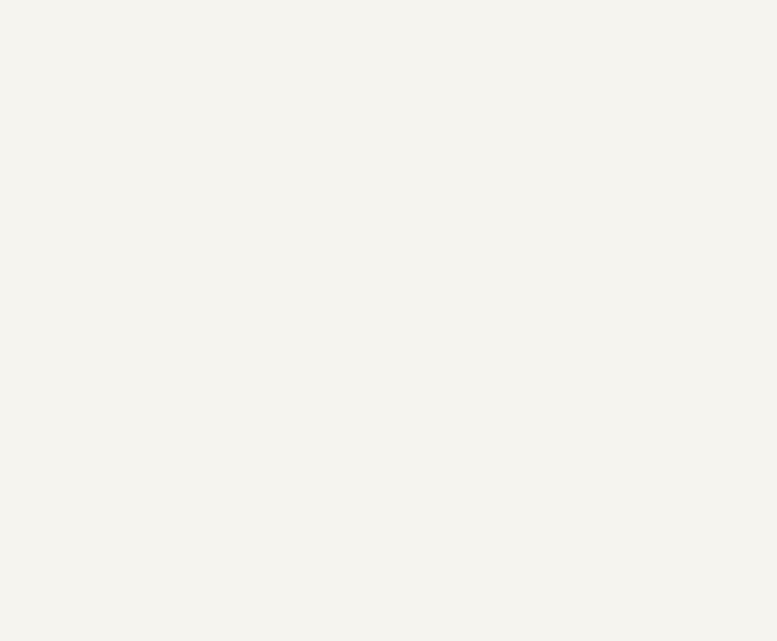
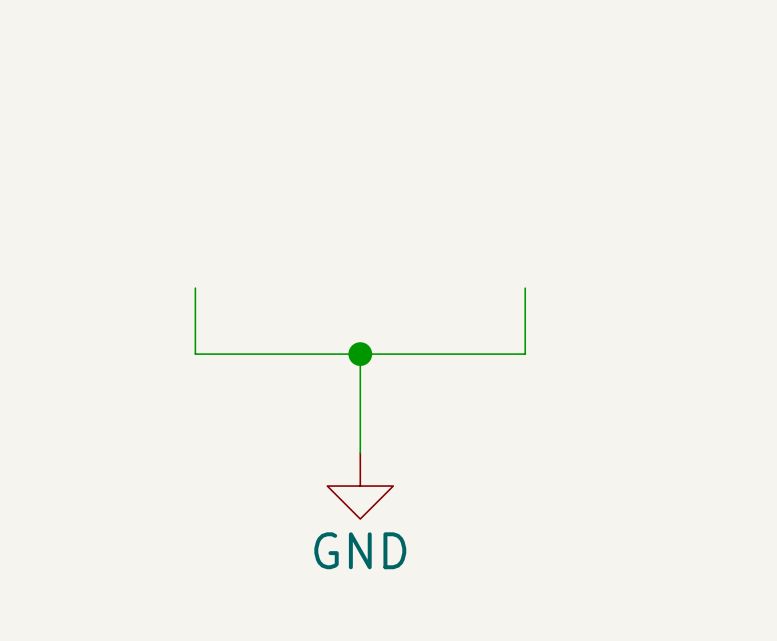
wire: none -> (195, 288) (195, 354) (525, 354) (525, 288)
wire: none -> (360, 354) (360, 453)
junction: none -> (360, 354)
power symbol: none -> GND (360, 486)

